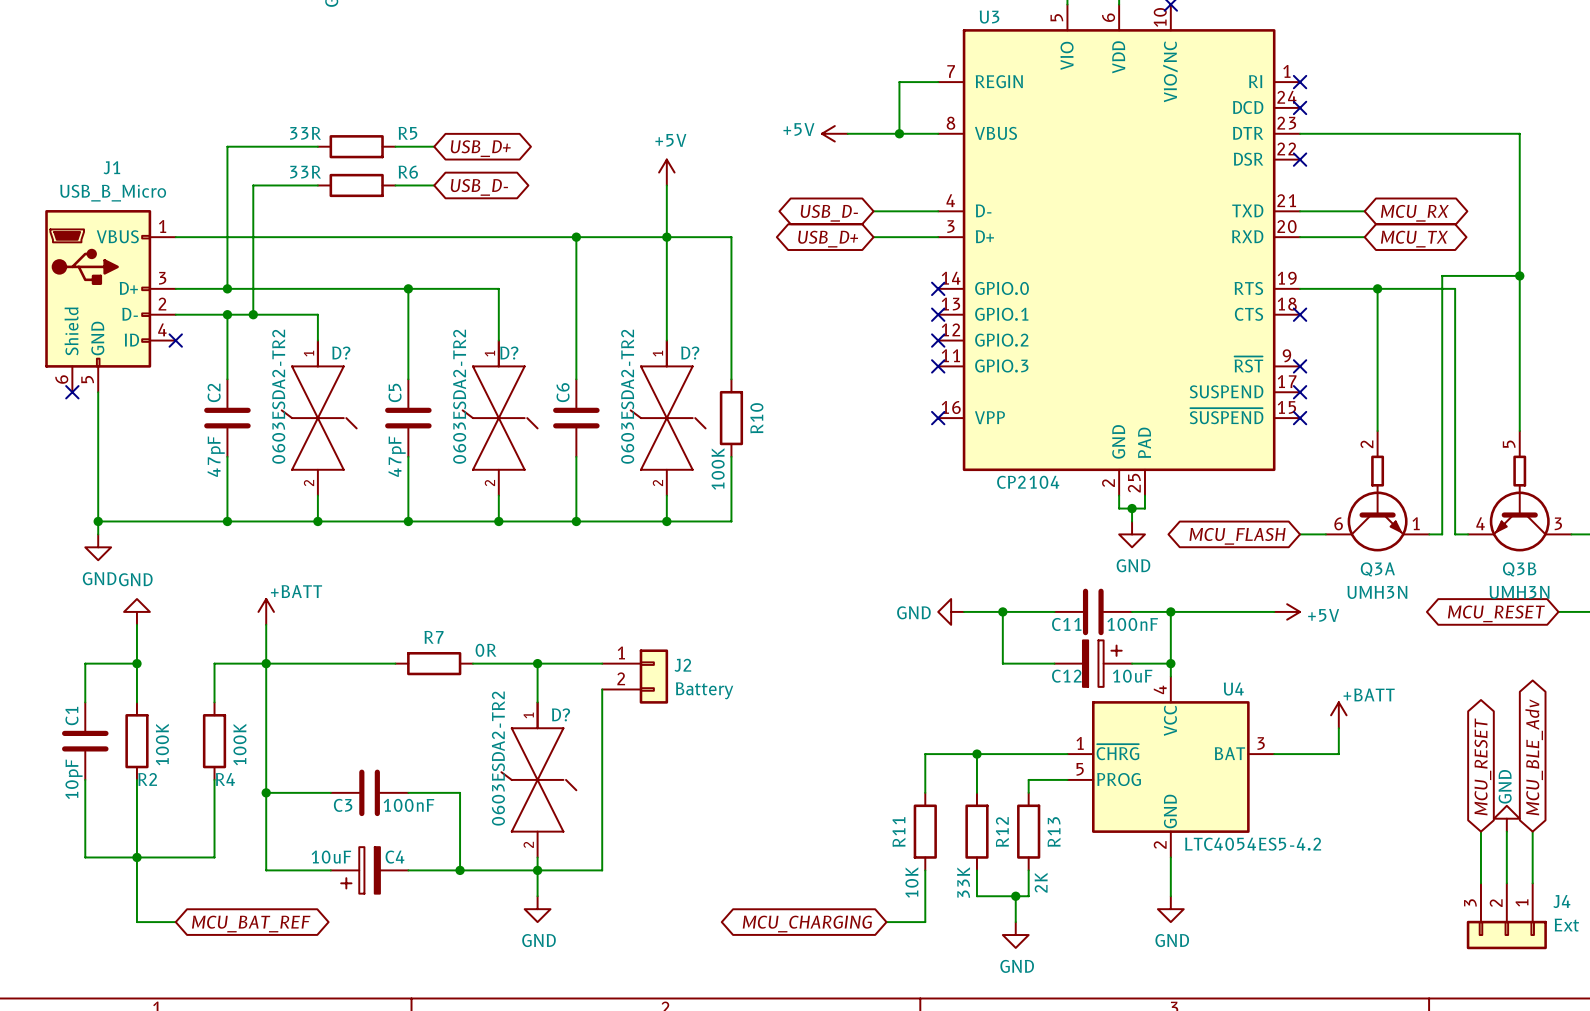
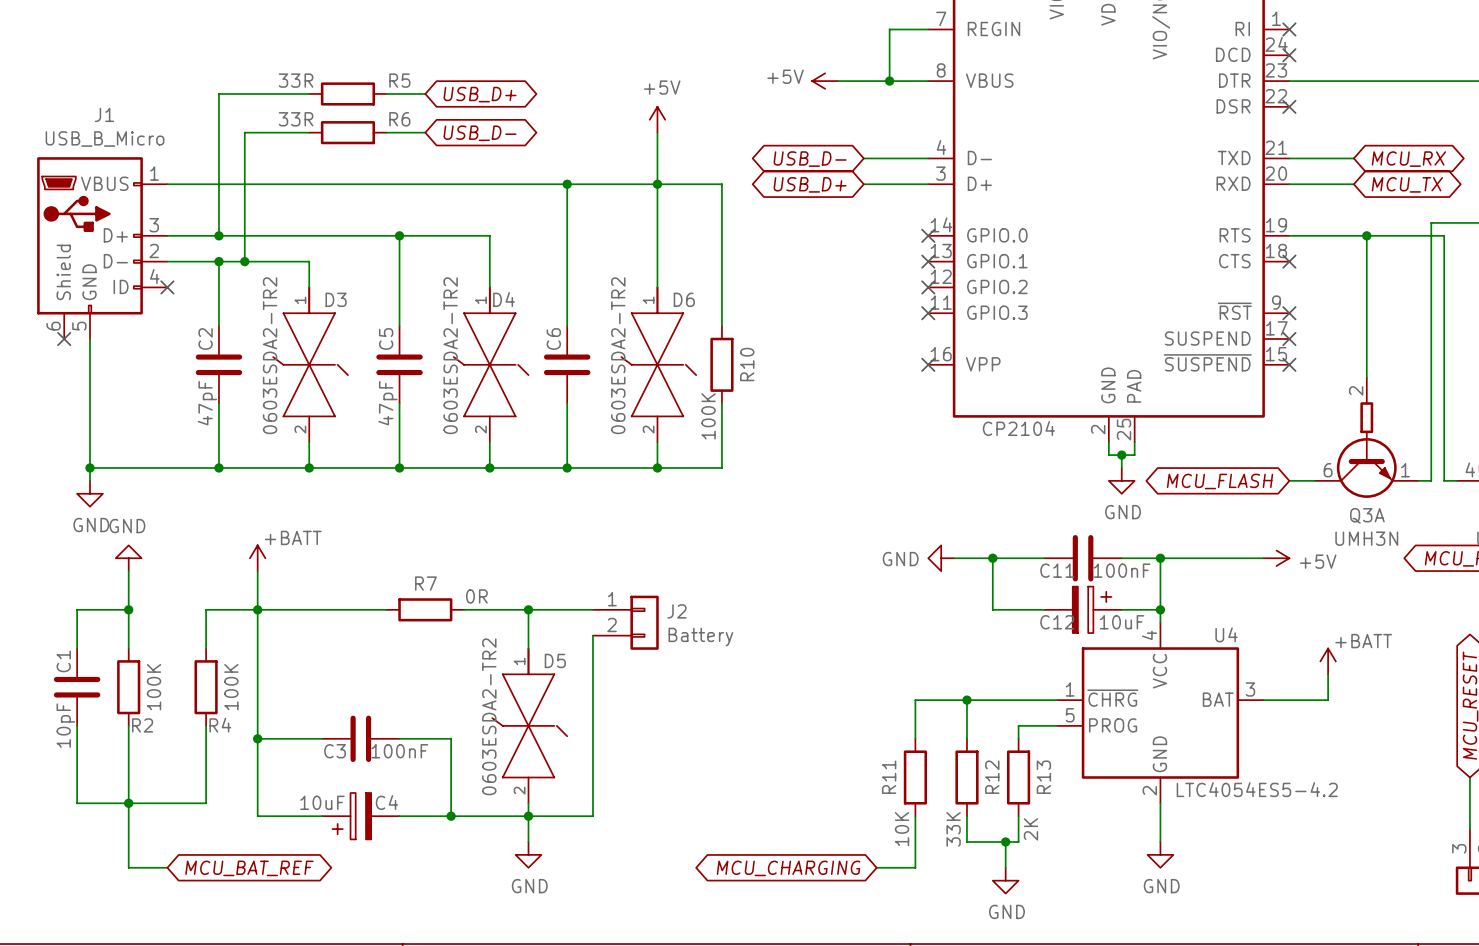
D? name: D? (341, 353) -> D3 (336, 299)
D? name: D? (509, 353) -> D4 (504, 299)
D? name: D? (690, 353) -> D6 (684, 299)
D? name: D? (561, 714) -> D5 (555, 660)

